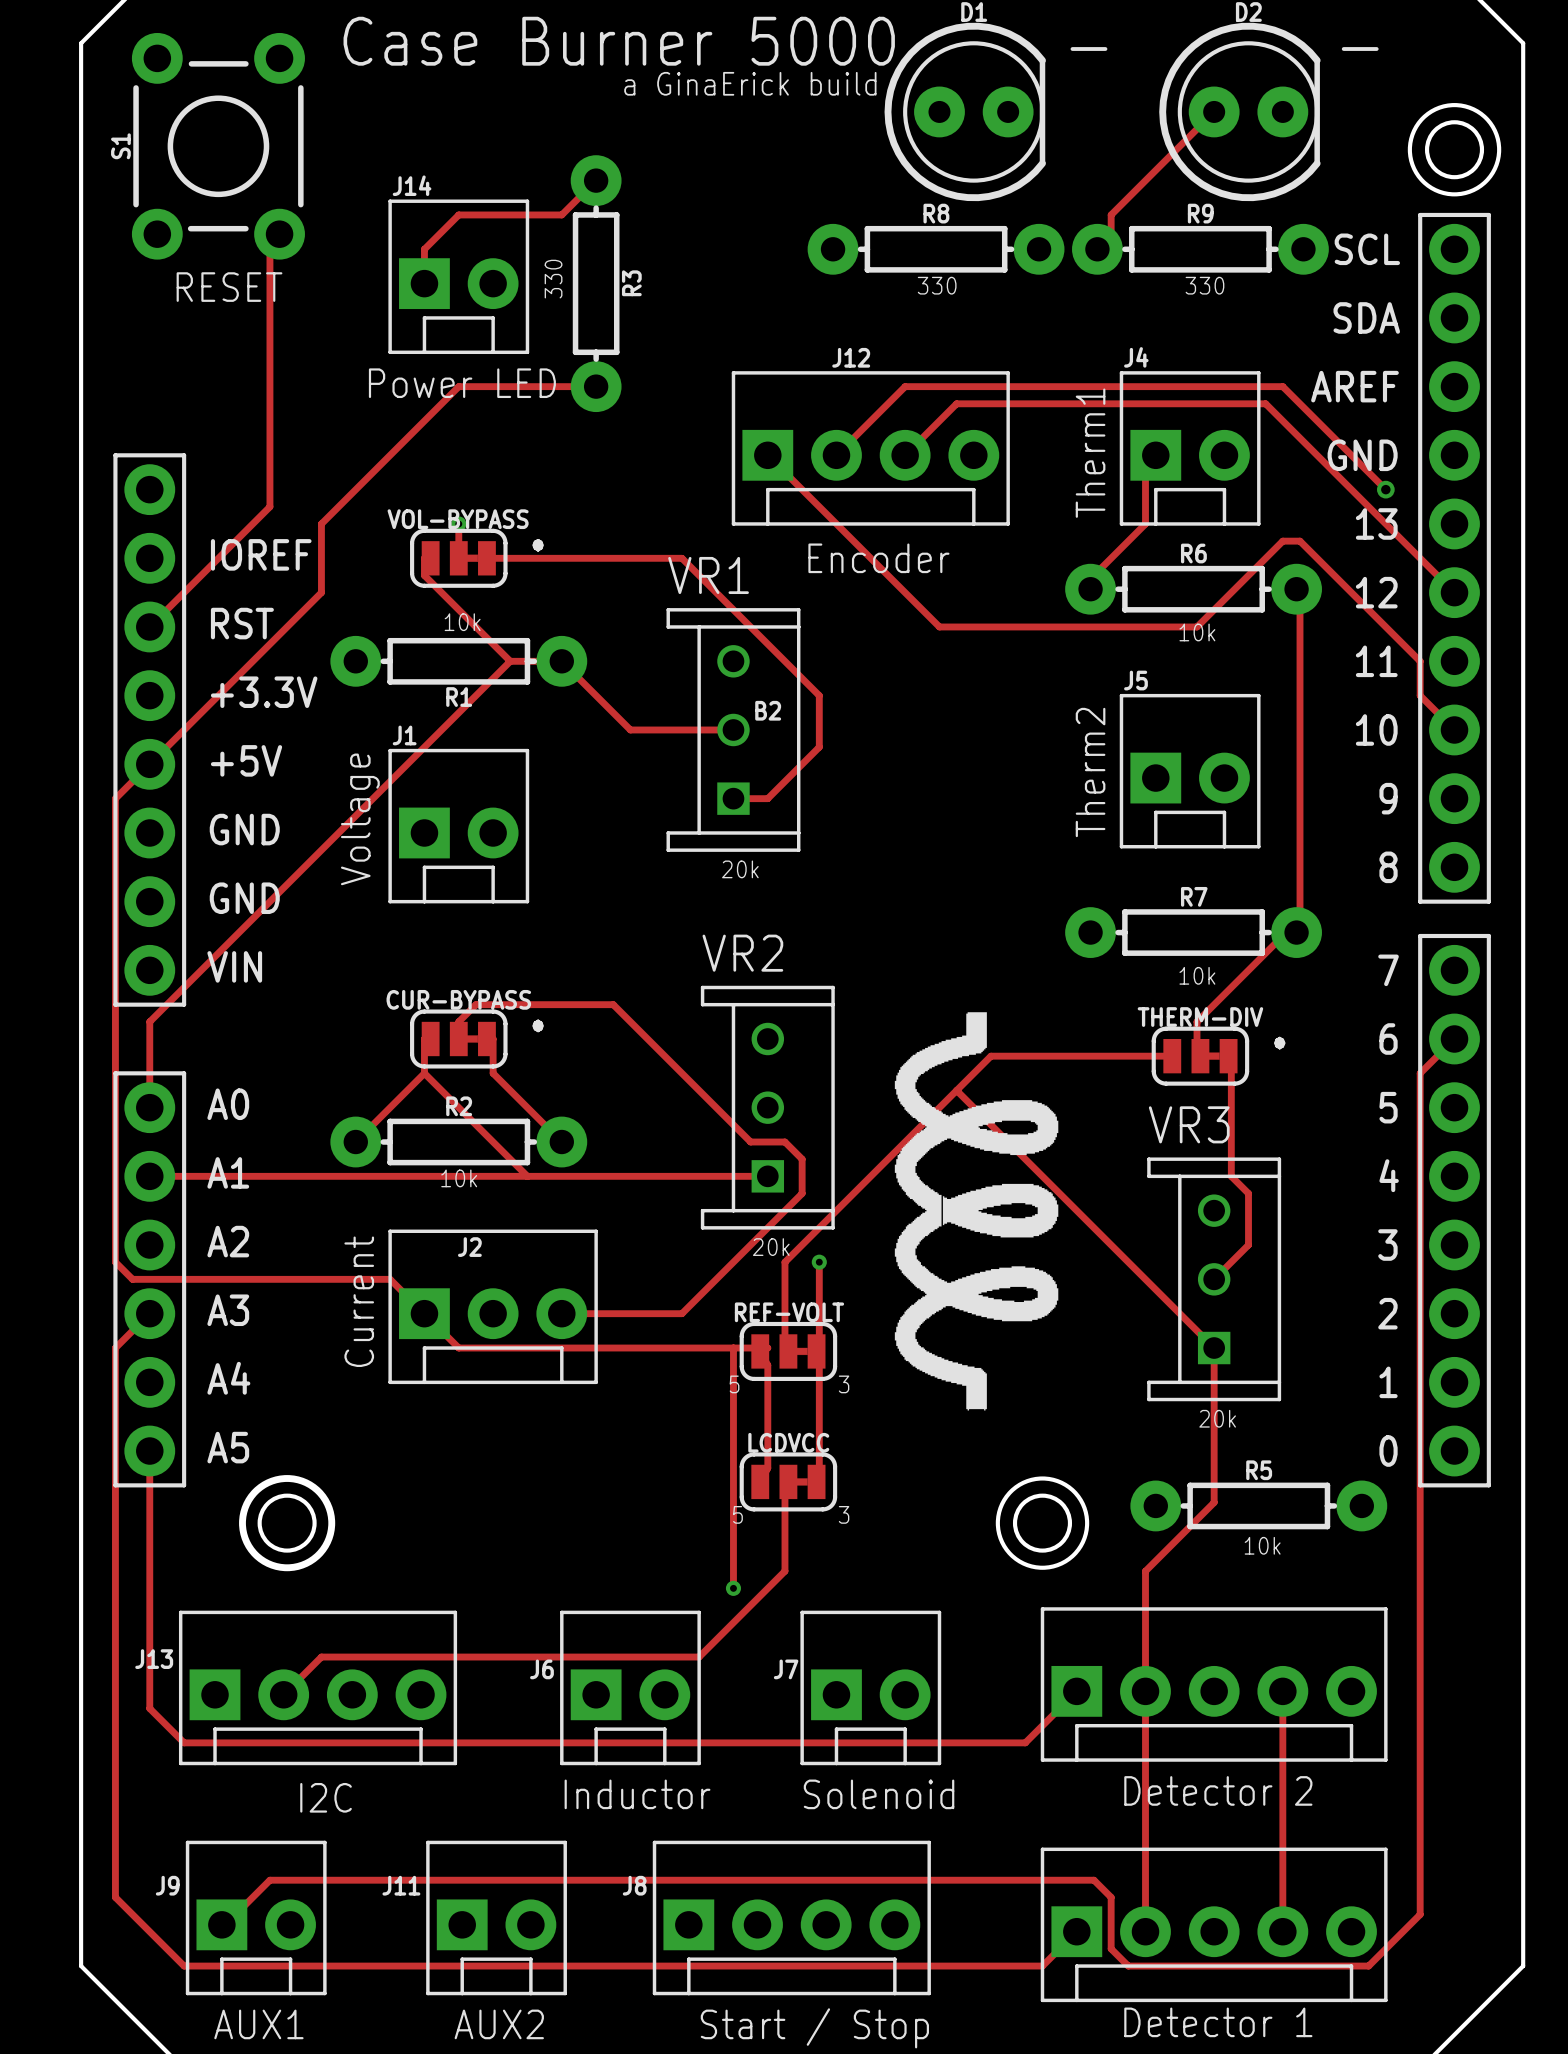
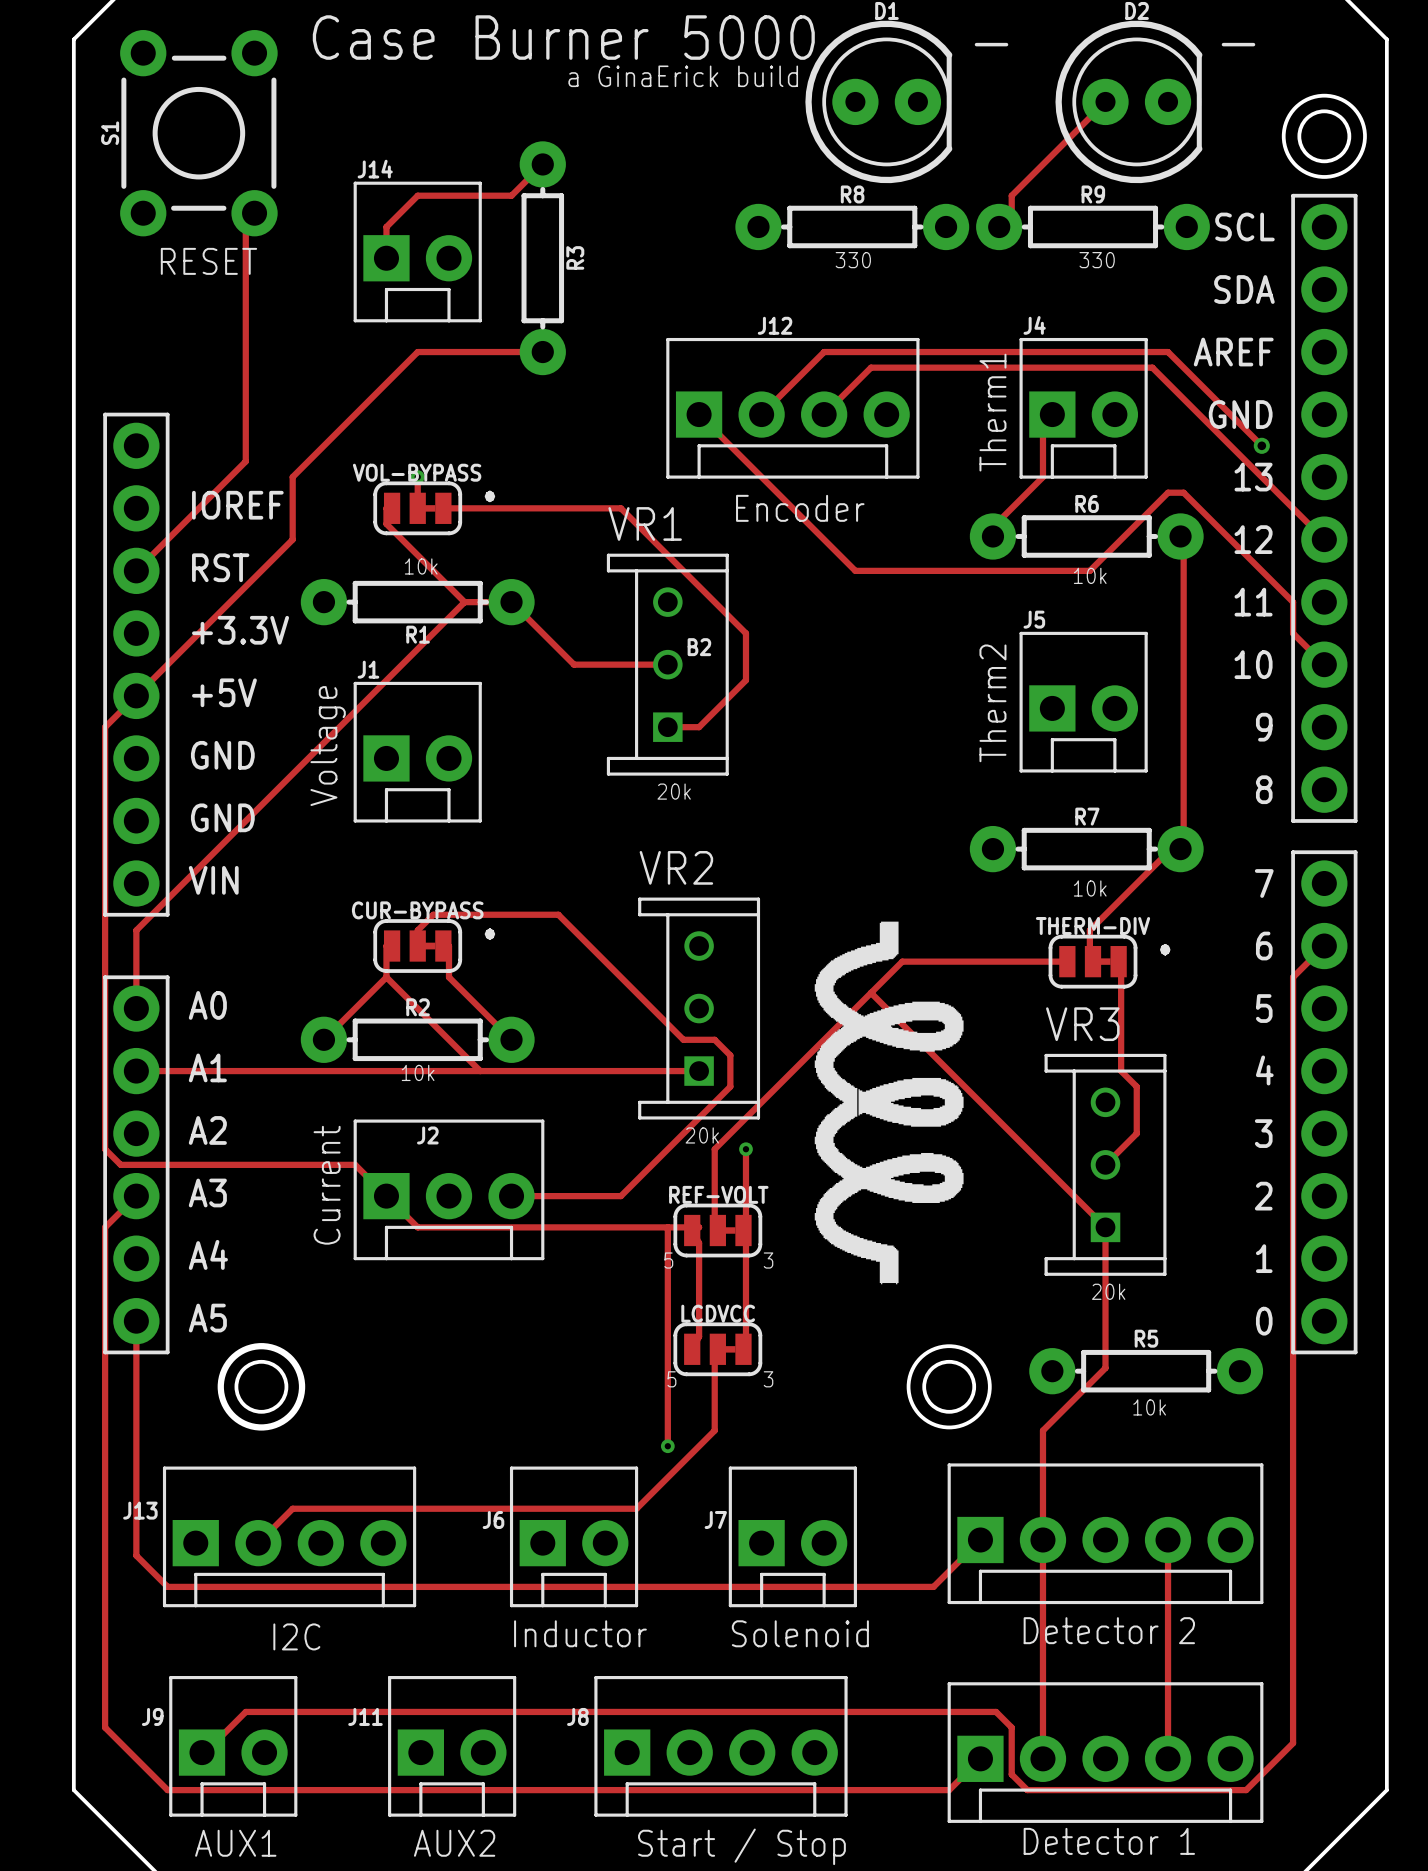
text: 330 (553, 279) -> none
text: Power LED (462, 383) -> none

